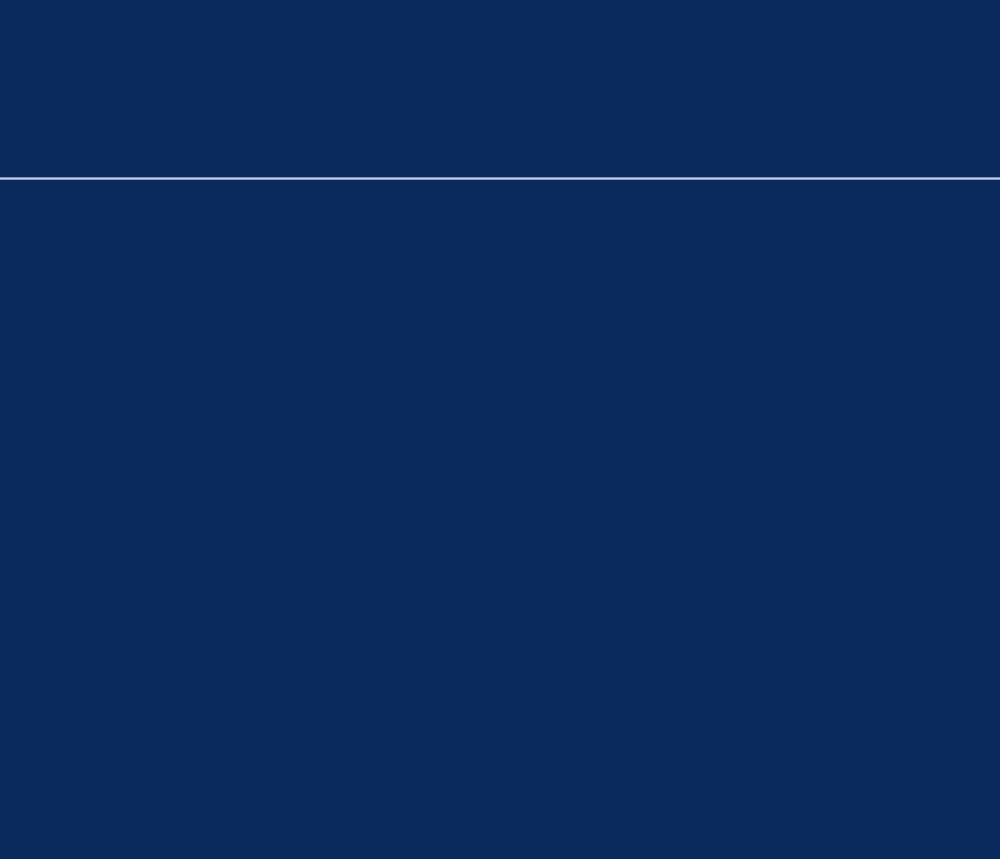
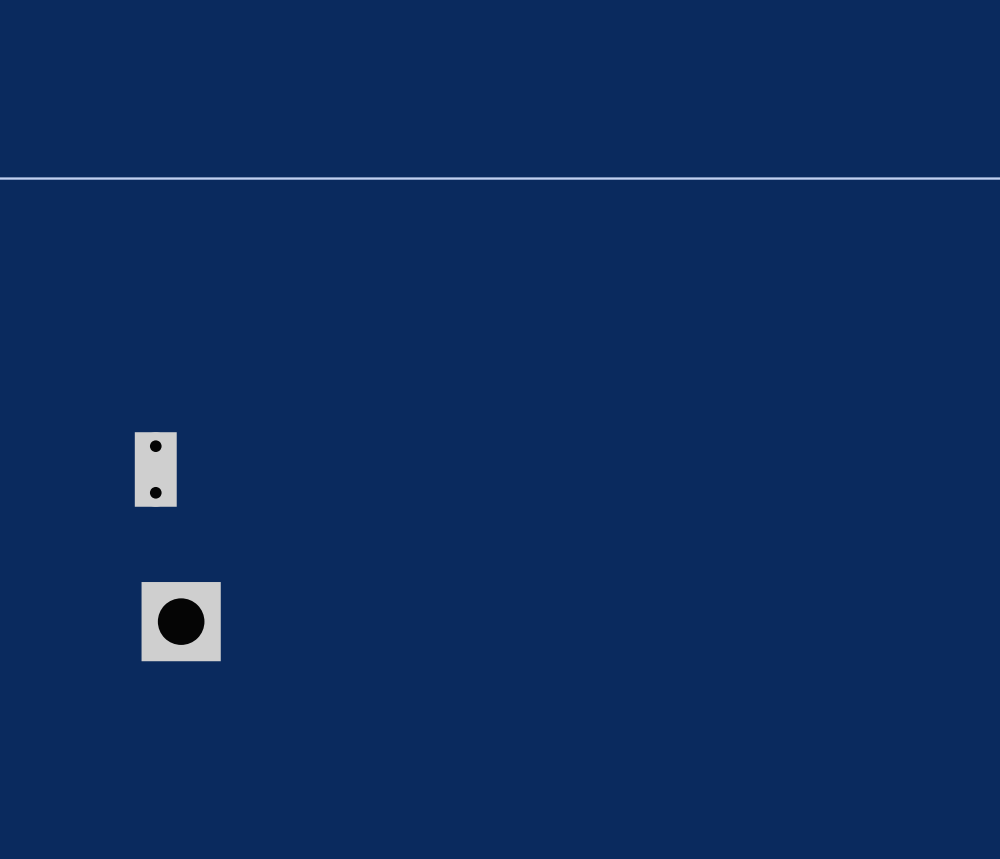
part: none -> (155, 469)
part: none -> (181, 621)

